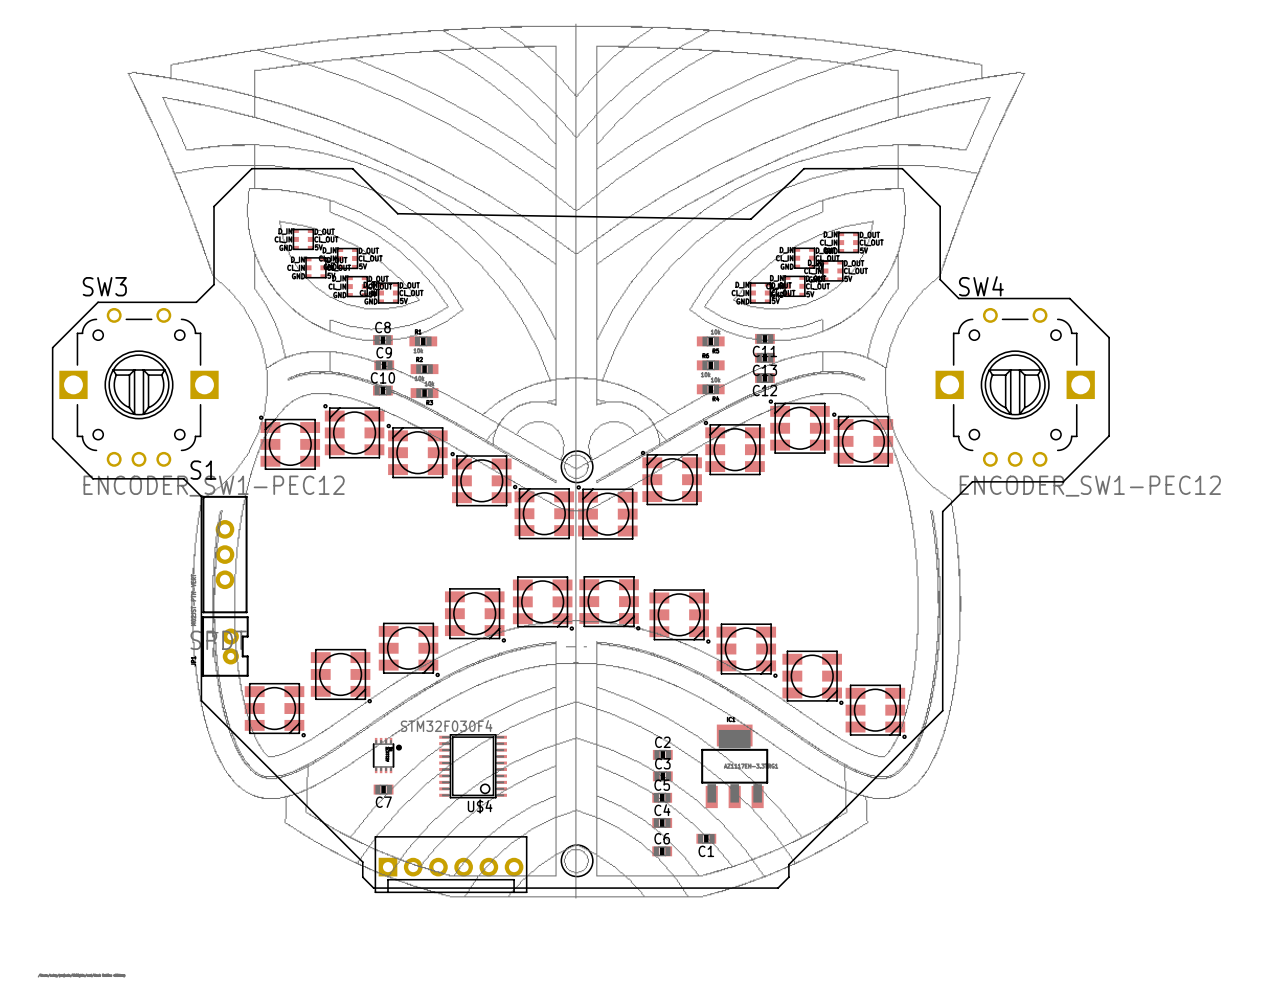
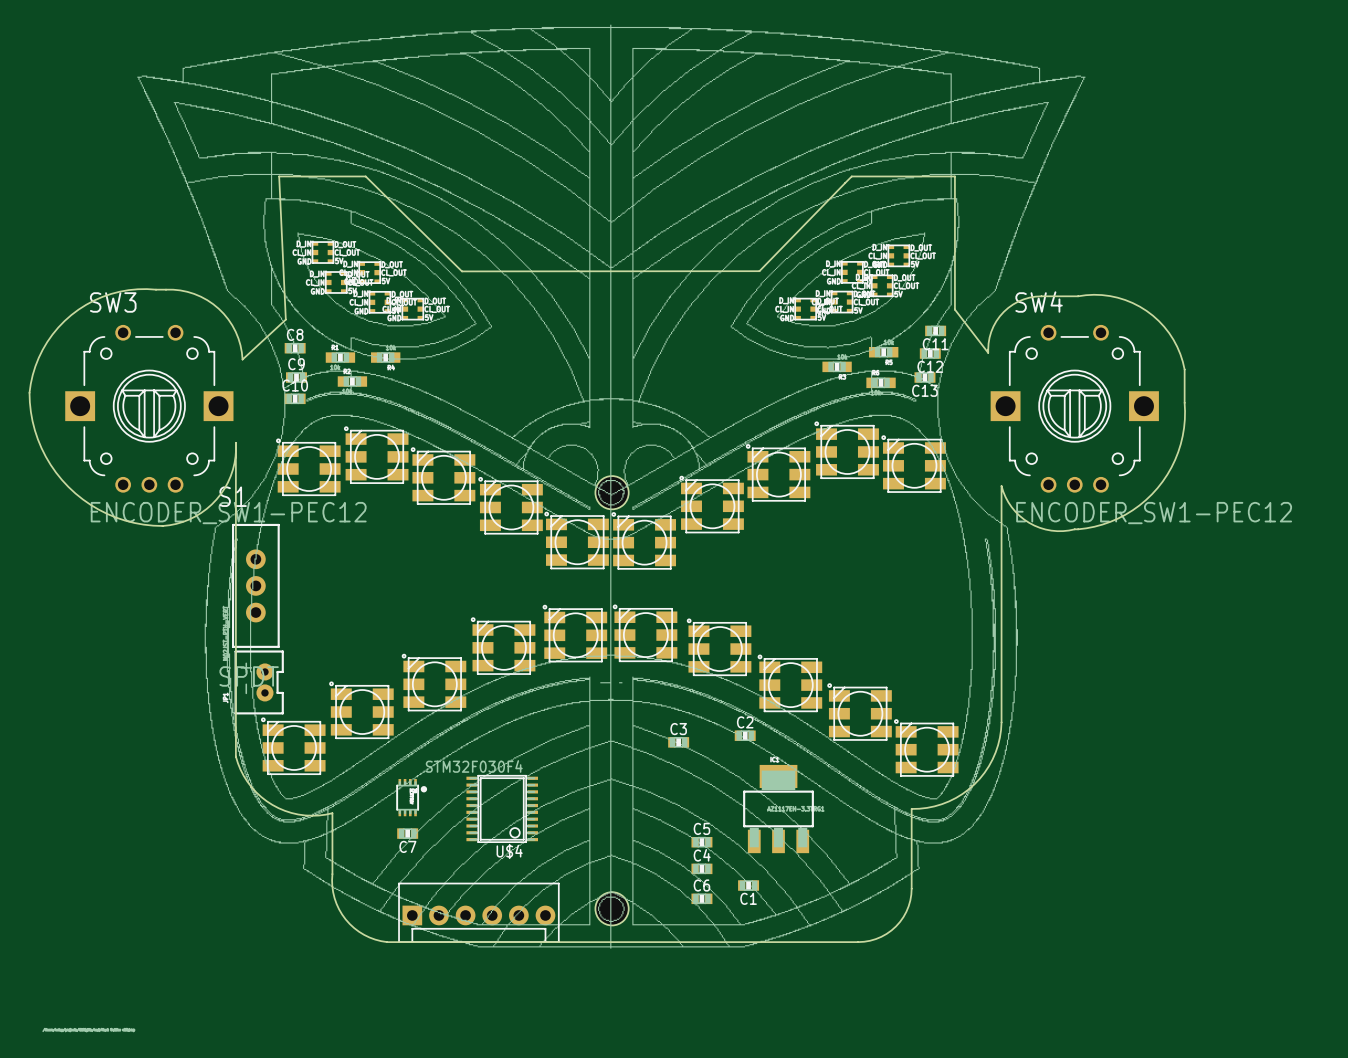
board edge: (251, 168) (352, 168) (397, 213) (750, 219) (804, 168) (902, 168) (940, 206) (940, 279) (958, 298) (1069, 298) (1109, 337) (1109, 435) (1063, 481) (972, 481) (942, 511) (942, 710) (788, 864) (788, 877) (778, 888) (373, 888) (362, 877) (362, 862) (201, 700) (201, 496) (183, 478) (92, 478) (52, 438) (52, 347) (98, 302) (196, 302) (214, 284) (214, 206) (251, 168) -> (279, 176) (285, 319) (242, 359) (238, 338) (232, 325) (223, 313) (207, 300) (187, 291) (173, 289) (137, 289) (119, 291) (86, 304) (71, 315) (52, 334) (35, 366) (30, 383) (29, 402) (37, 439) (45, 456) (62, 480) (82, 499) (98, 509) (134, 522) (169, 525) (189, 519) (206, 508) (220, 494) (230, 476) (234, 463) (235, 442) (235, 756) (247, 781) (256, 792) (272, 804) (298, 814) (311, 815) (332, 813) (332, 886) (336, 903) (345, 919) (364, 934) (387, 942) (858, 942) (875, 939) (891, 930) (906, 911) (911, 894) (911, 808) (941, 804) (968, 789) (988, 766) (998, 745) (1001, 722) (1001, 486) (1008, 502) (1019, 515) (1034, 525) (1057, 531) (1086, 528) (1110, 521) (1132, 510) (1151, 494) (1167, 474) (1175, 459) (1180, 444) (1184, 419) (1184, 369) (1177, 346) (1164, 326) (1139, 306) (1117, 297) (1093, 294) (1035, 296) (1013, 304) (999, 316) (991, 331) (988, 352) (954, 309) (954, 176) (851, 176) (759, 271) (462, 271) (365, 176) (279, 176)
C11 position: (764, 338) -> (935, 330)
C8 position: (382, 340) -> (295, 348)
part position: (423, 341) -> (340, 357)
part position: (710, 341) -> (883, 352)
C13 position: (764, 357) -> (924, 377)
C9 position: (384, 365) -> (296, 377)
part position: (710, 365) -> (881, 382)
part position: (424, 369) -> (352, 381)
C12 position: (764, 377) -> (930, 353)
part position: (710, 389) -> (385, 357)
C10 position: (382, 390) -> (295, 398)
part position: (424, 393) -> (837, 366)
S1 position: (224, 554) -> (255, 585)
part rotation: 0° (543, 603) -> 180° (574, 633)
part rotation: 0° (609, 603) -> 180° (645, 633)
part rotation: 0° (475, 615) -> 180° (503, 646)
part rotation: 0° (679, 616) -> 180° (719, 647)
part position: (225, 646) -> (259, 682)
part rotation: 0° (409, 649) -> 180° (434, 682)
part rotation: 0° (746, 650) -> 180° (790, 683)
part rotation: 0° (341, 676) -> 180° (361, 710)
part rotation: 0° (812, 677) -> 180° (859, 712)
part rotation: 0° (275, 710) -> 180° (293, 746)
part rotation: 0° (876, 711) -> 180° (926, 747)
C2 position: (662, 754) -> (745, 735)
C3 position: (662, 776) -> (678, 742)

